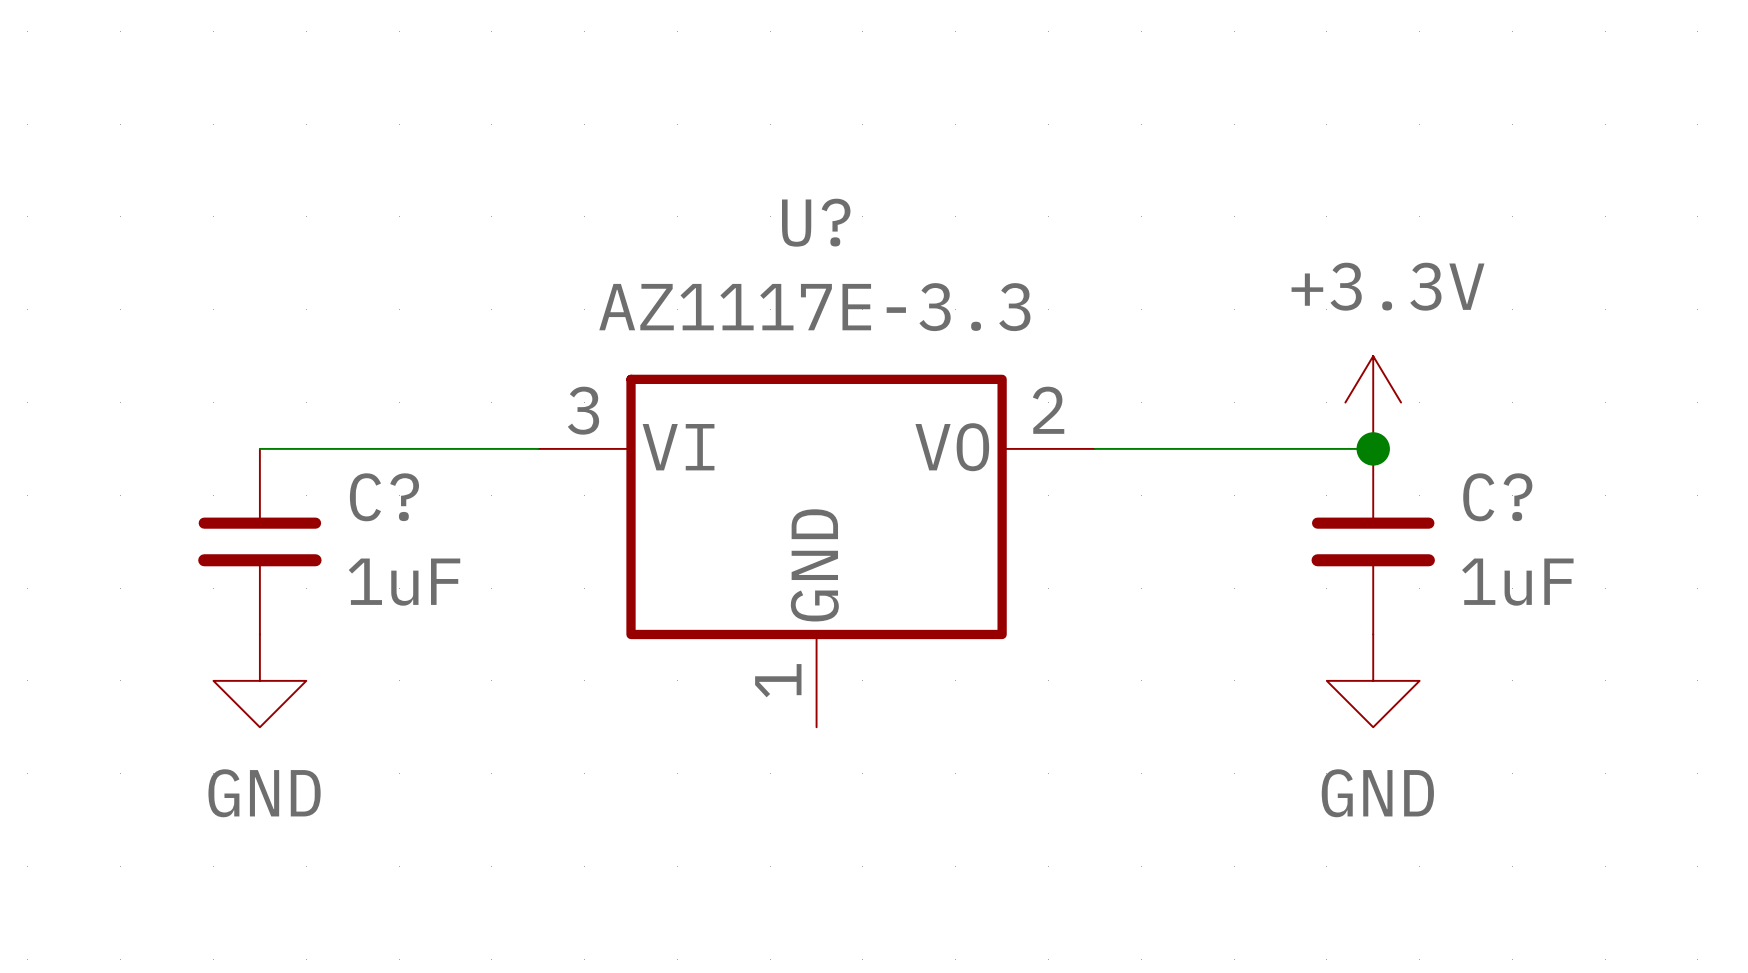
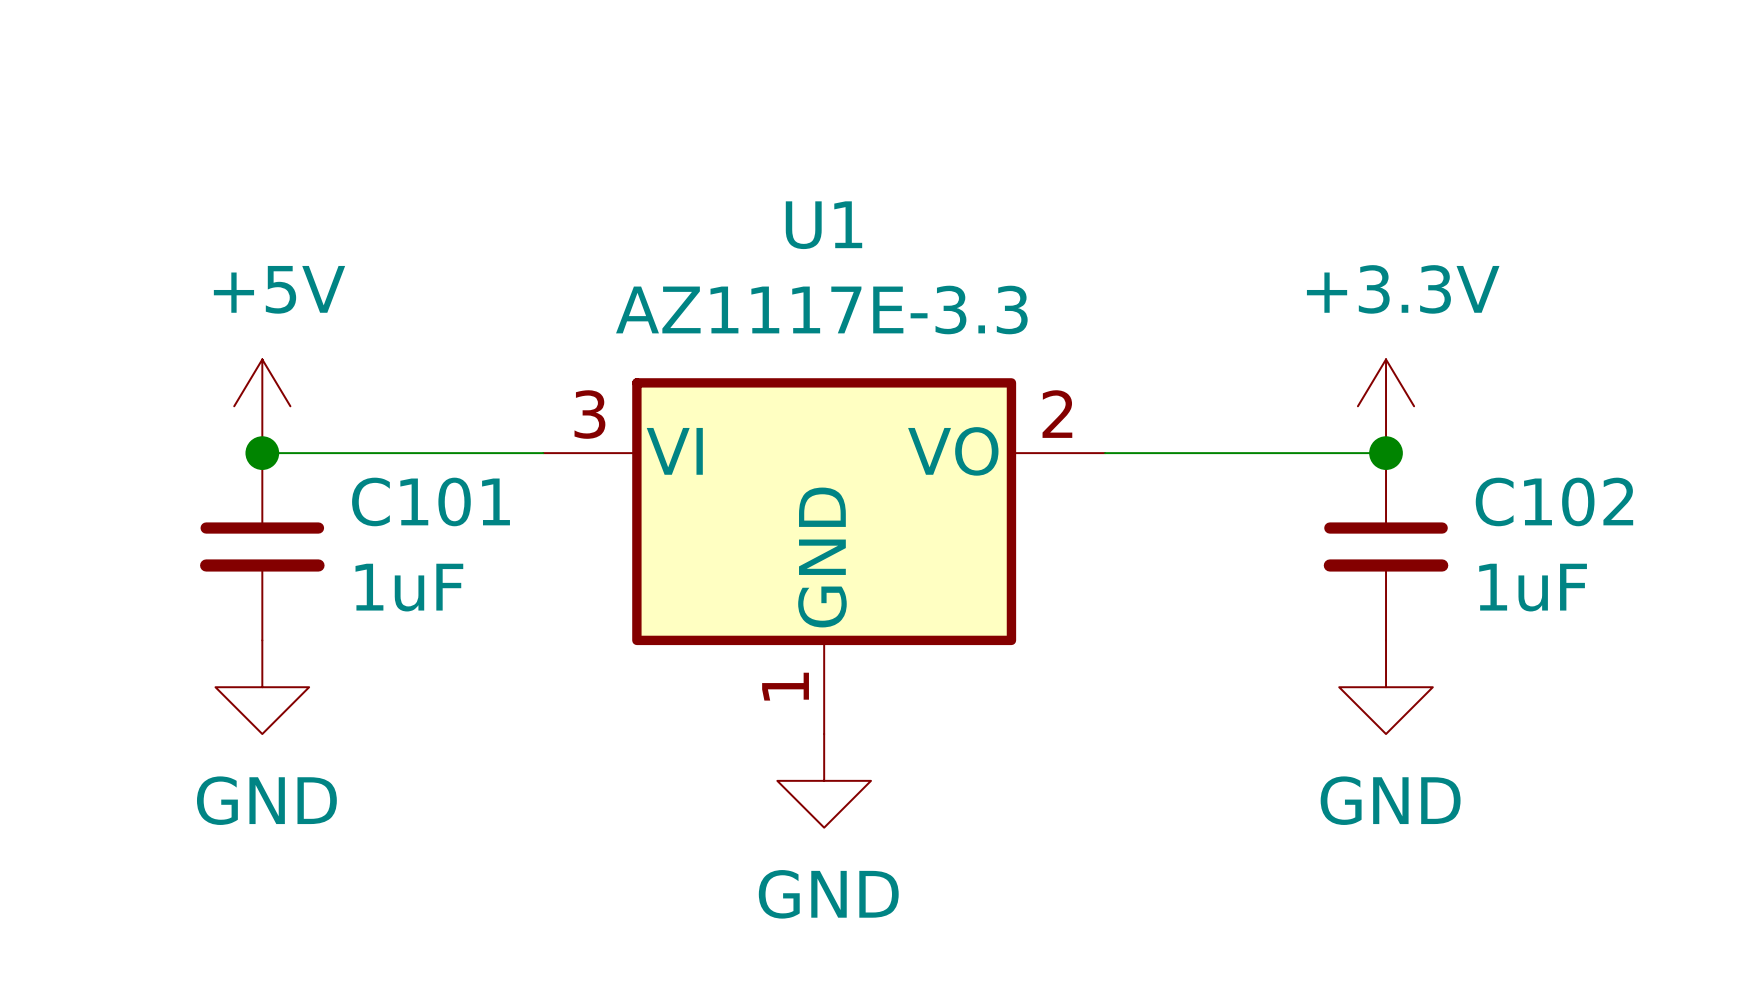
U? name: U? (816, 222) -> U1 (823, 225)
power symbol: none -> +5V (262, 406)
junction: none -> (262, 453)
C? name: C? (384, 497) -> C101 (431, 501)
C? name: C? (1497, 497) -> C102 (1554, 501)
power symbol: none -> GND (824, 780)

